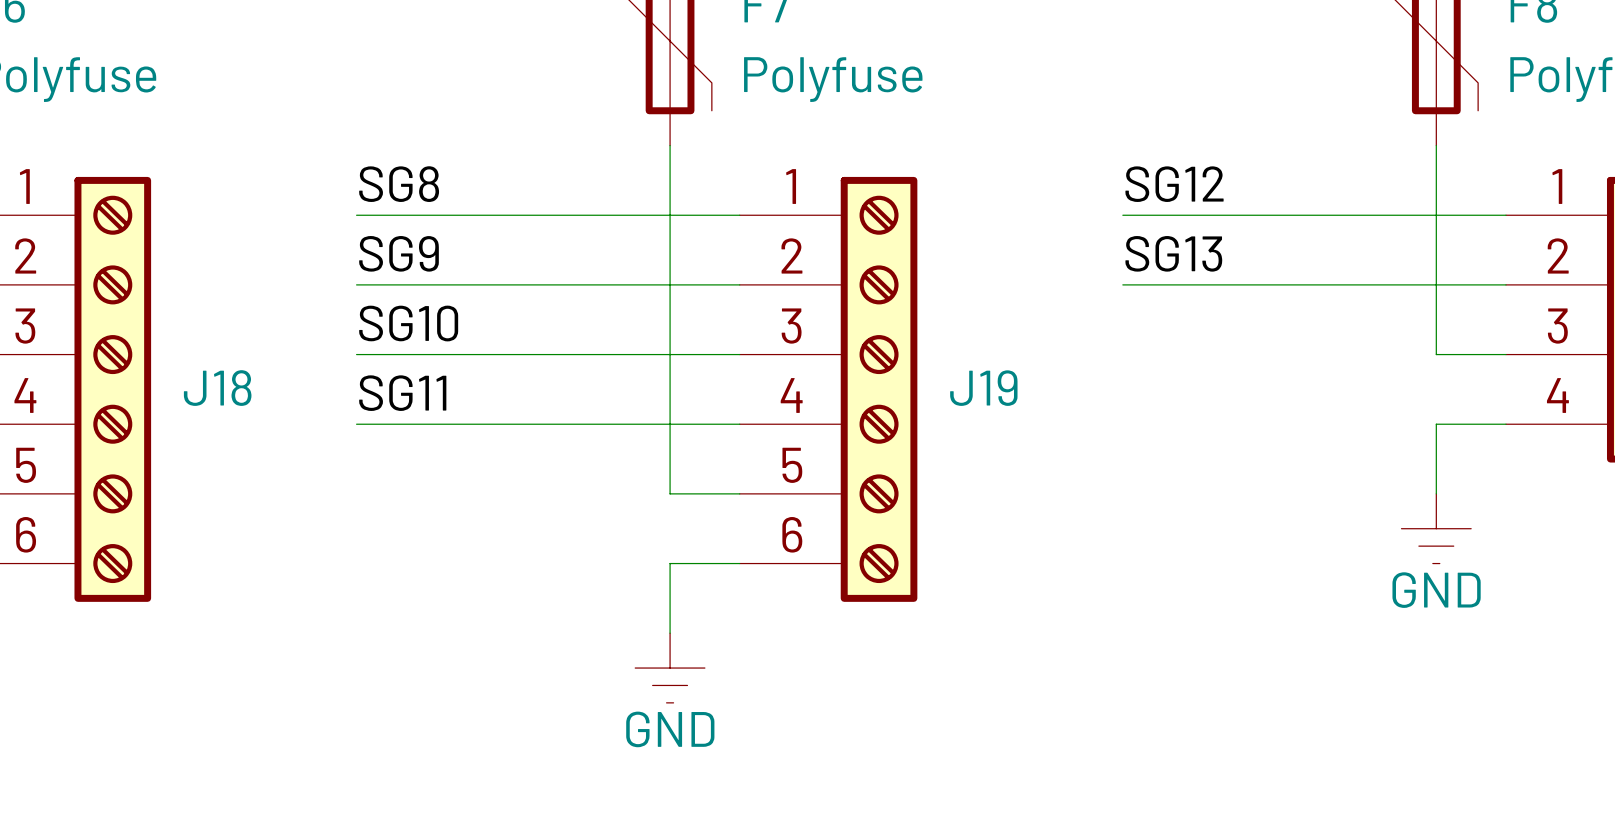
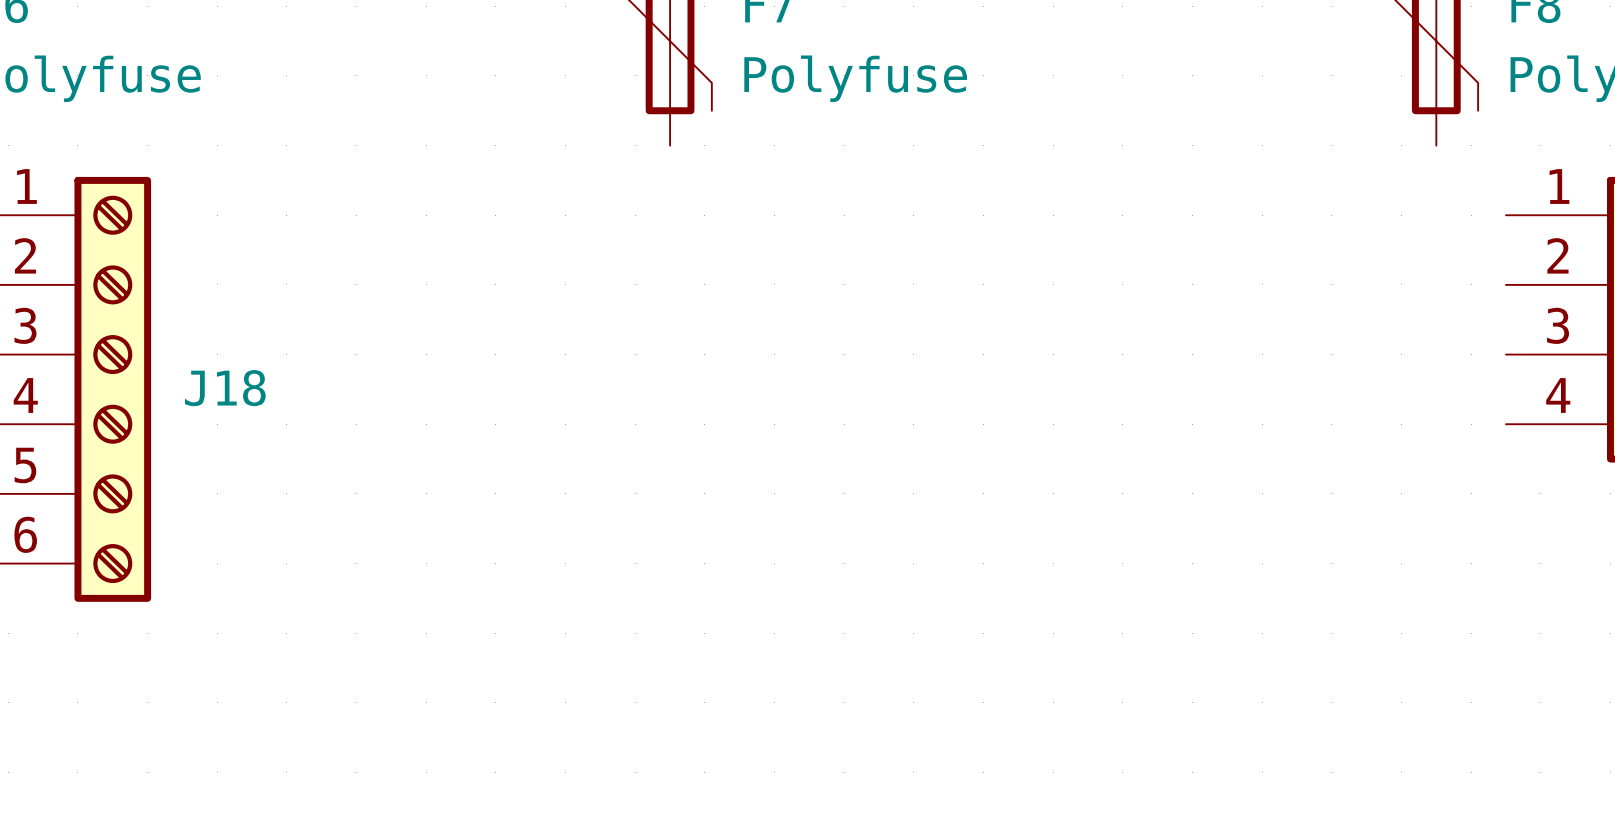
wire: (670, 145) (670, 493) (739, 493) -> none
wire: (1436, 145) (1436, 354) (1505, 354) -> none
label: SG8 (399, 184) -> none
label: SG12 (1174, 184) -> none
wire: (356, 215) (739, 215) -> none
wire: (1122, 215) (1505, 215) -> none
label: SG9 (399, 253) -> none
label: SG13 (1173, 253) -> none
wire: (356, 284) (739, 284) -> none
wire: (1122, 284) (1505, 284) -> none
label: SG10 (408, 323) -> none
wire: (356, 354) (739, 354) -> none
J19: (828, 389) -> none
label: SG11 (402, 393) -> none
wire: (356, 424) (739, 424) -> none
wire: (1505, 424) (1436, 424) (1436, 493) -> none
power symbol: GND (1436, 528) -> none
wire: (739, 563) (670, 563) (670, 633) -> none
power symbol: GND (670, 668) -> none

